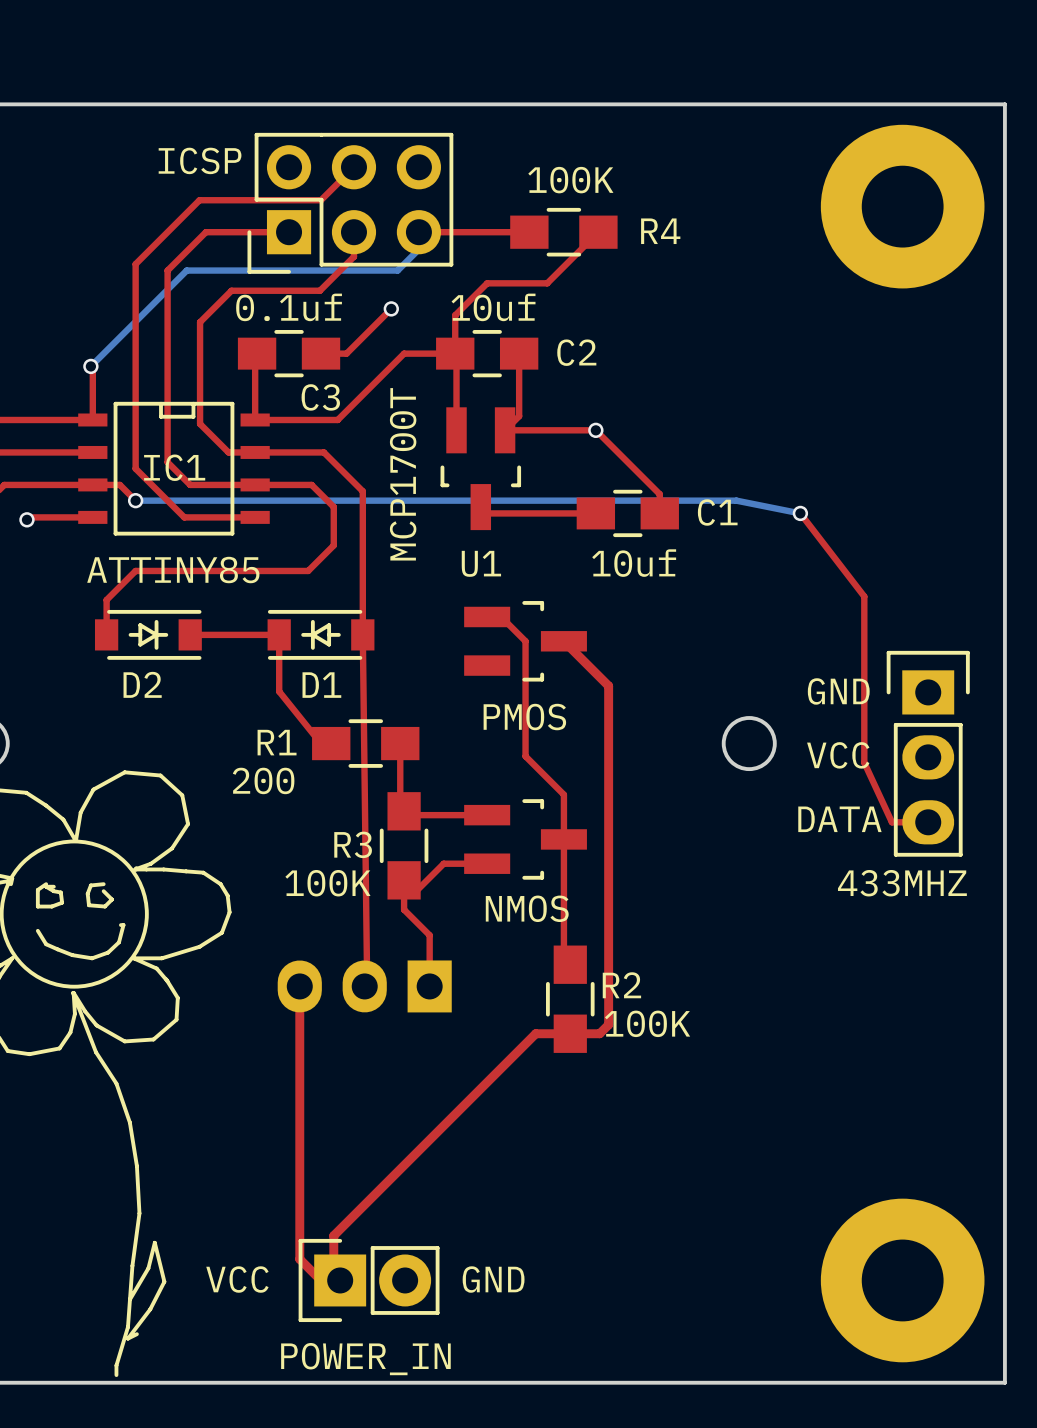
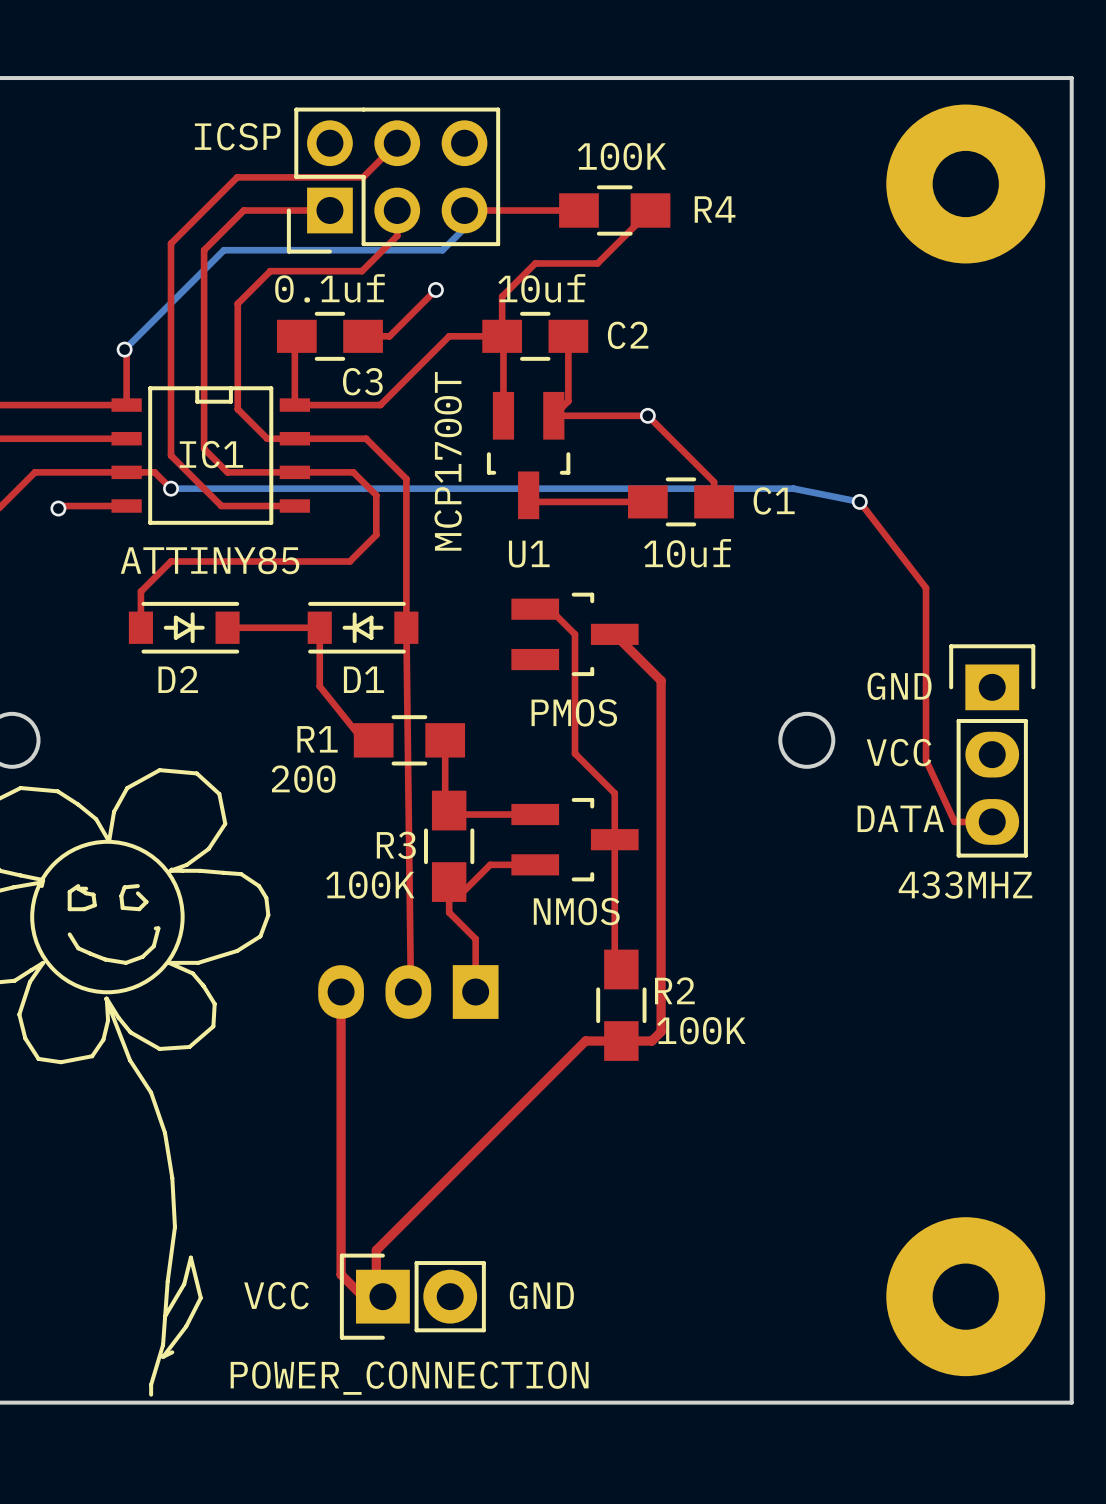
part footprint: [820, 124, 985, 289] -> [886, 104, 1046, 264]
part footprint: [820, 1198, 985, 1363] -> [886, 1217, 1046, 1377]
part value: POWER_IN (365, 1359) -> POWER_CONNECTION (409, 1378)

